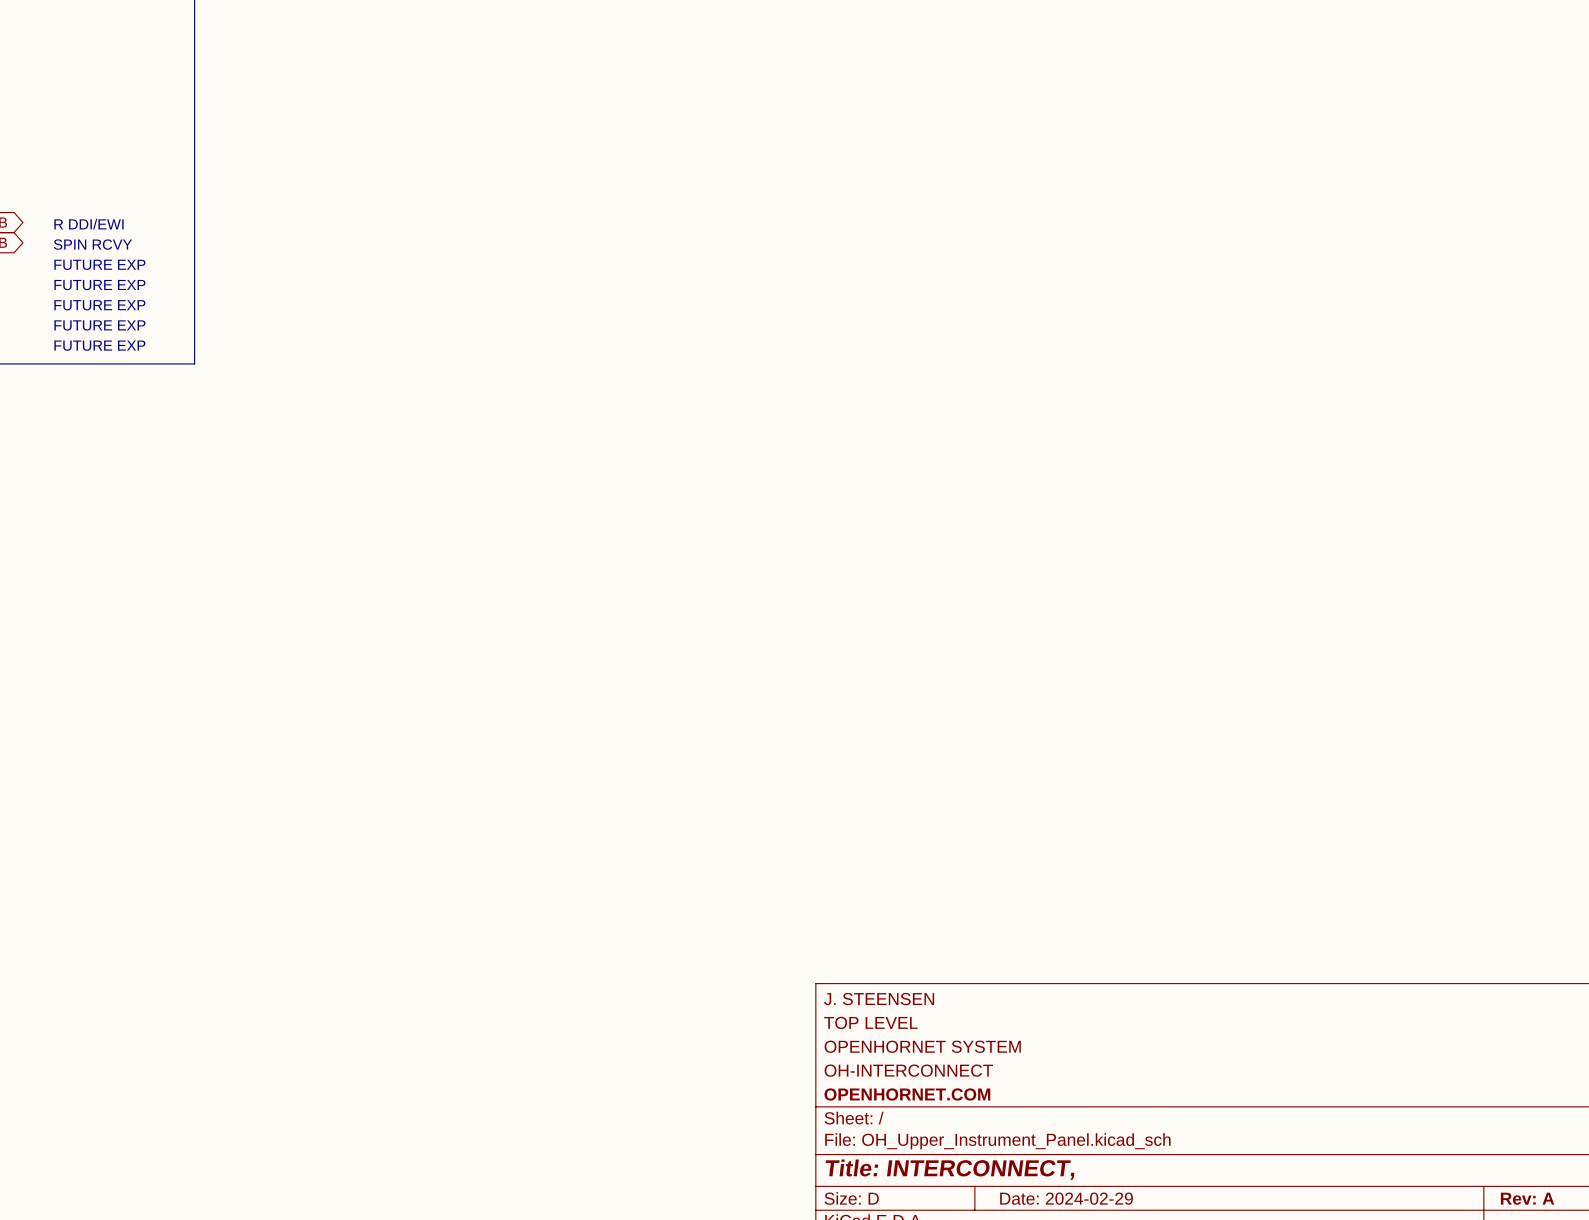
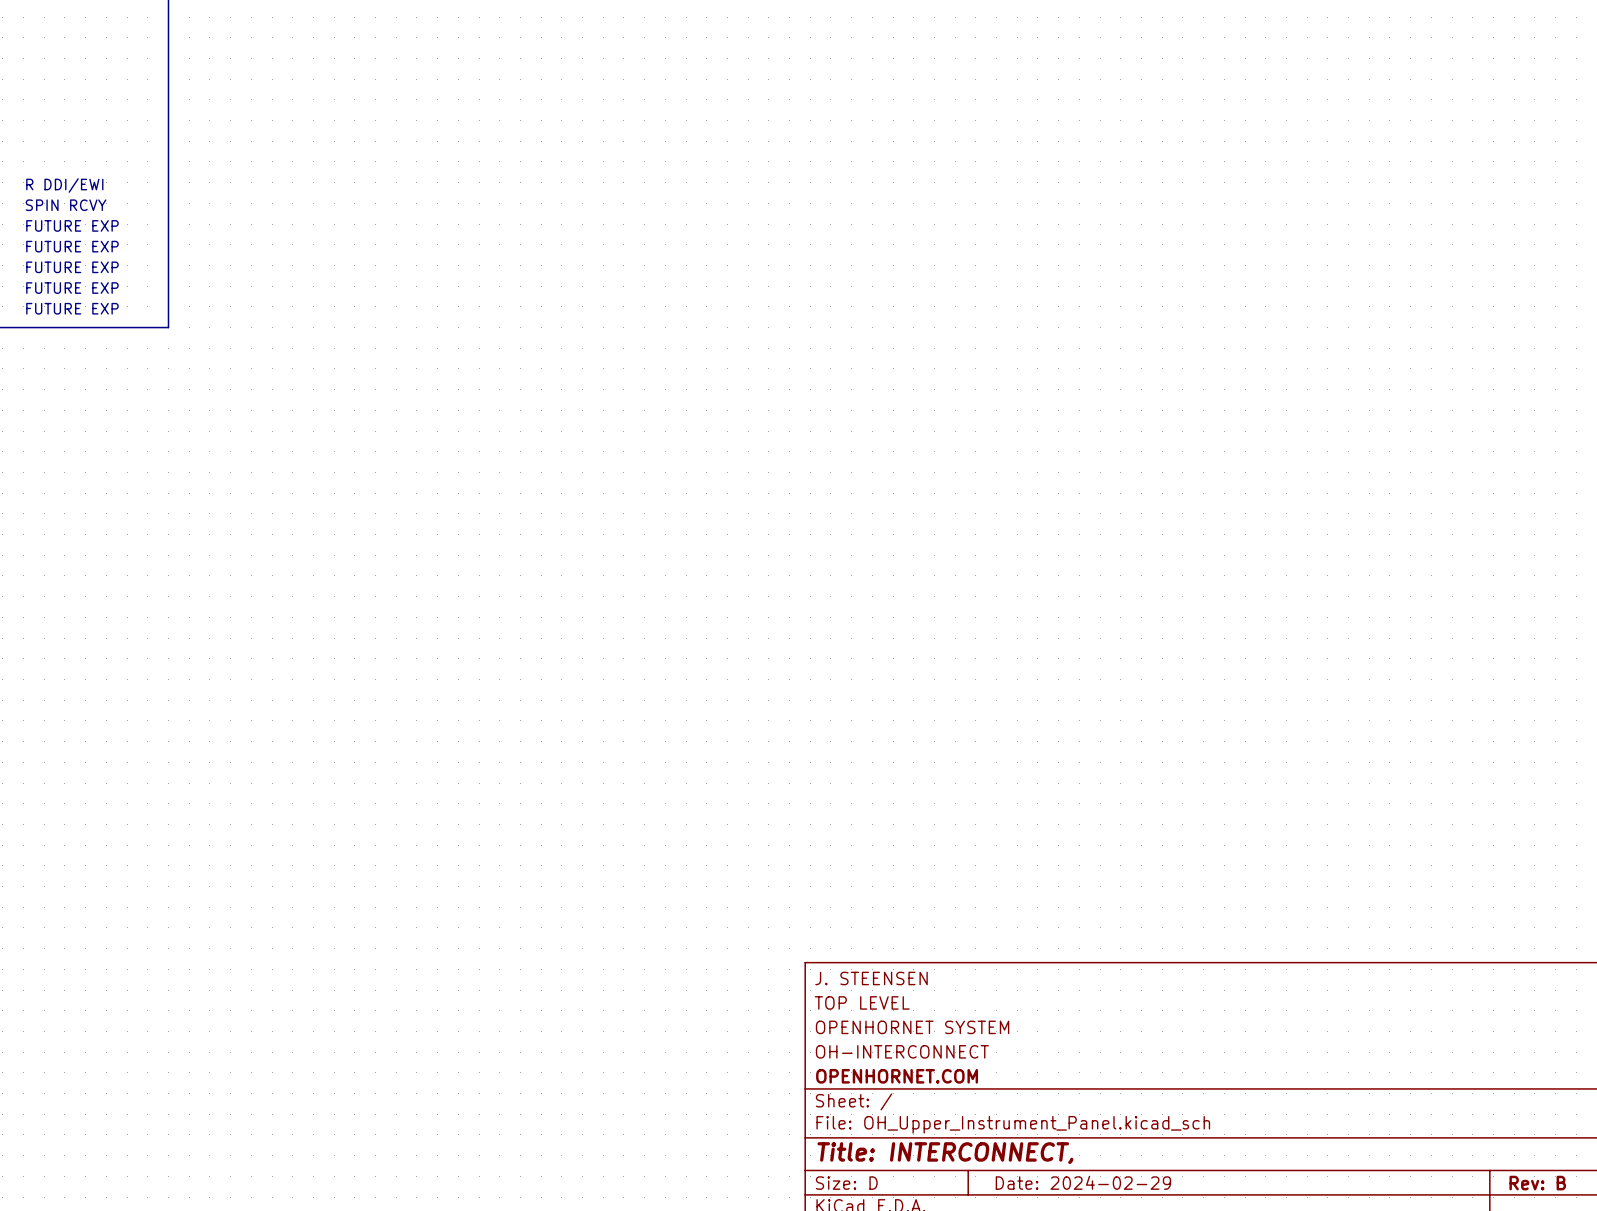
title block: Rev: A (1527, 1198) -> Rev: B (1537, 1183)

